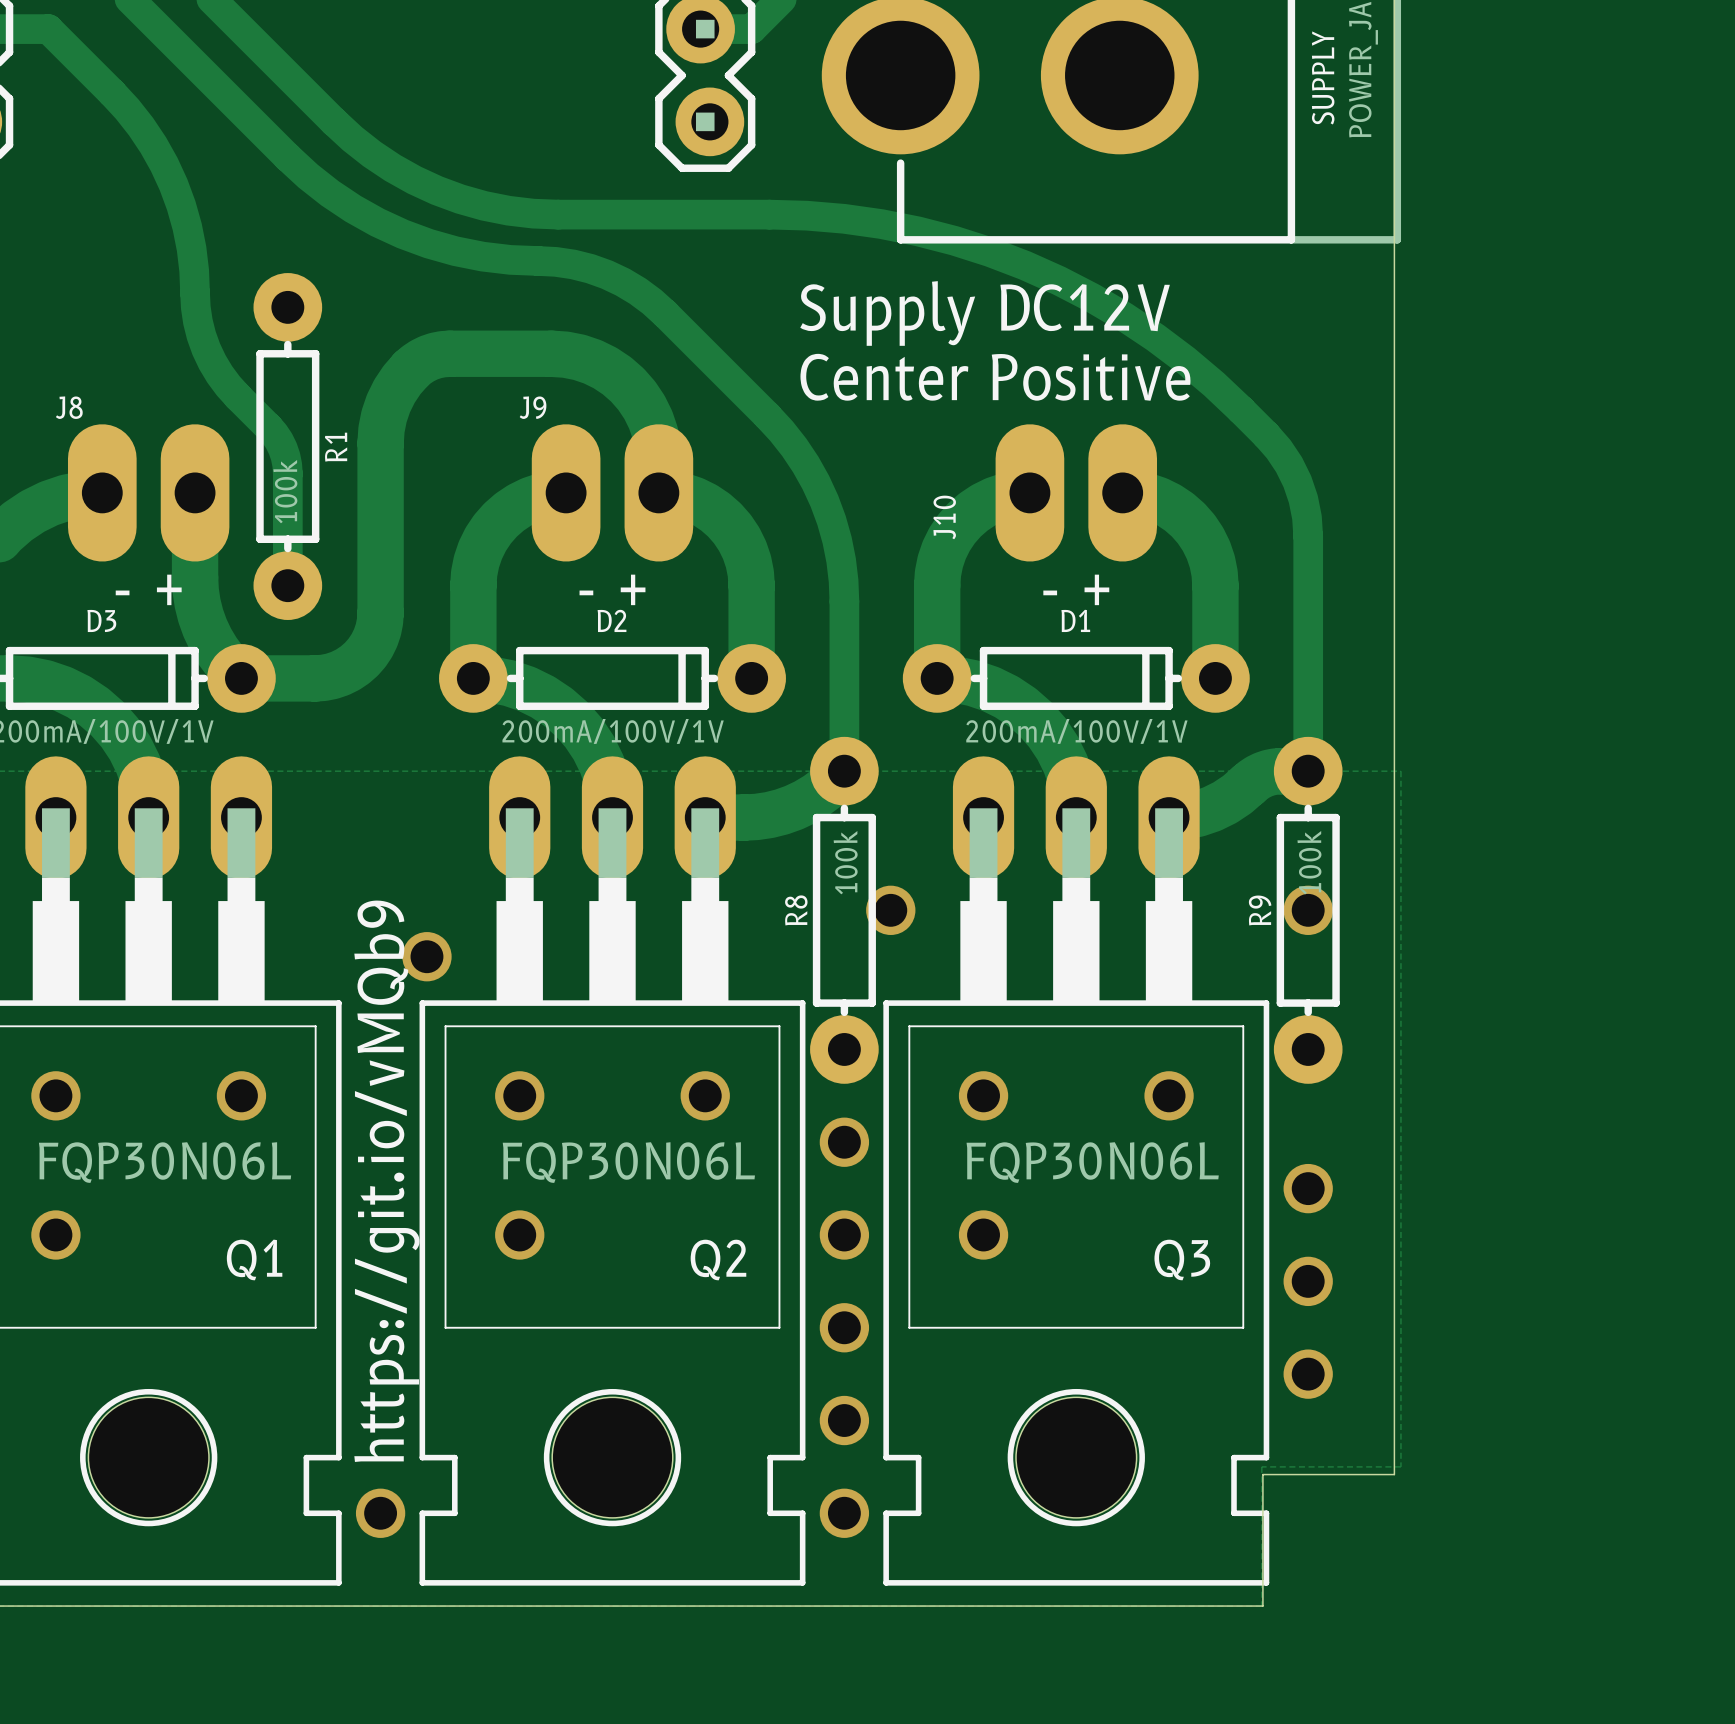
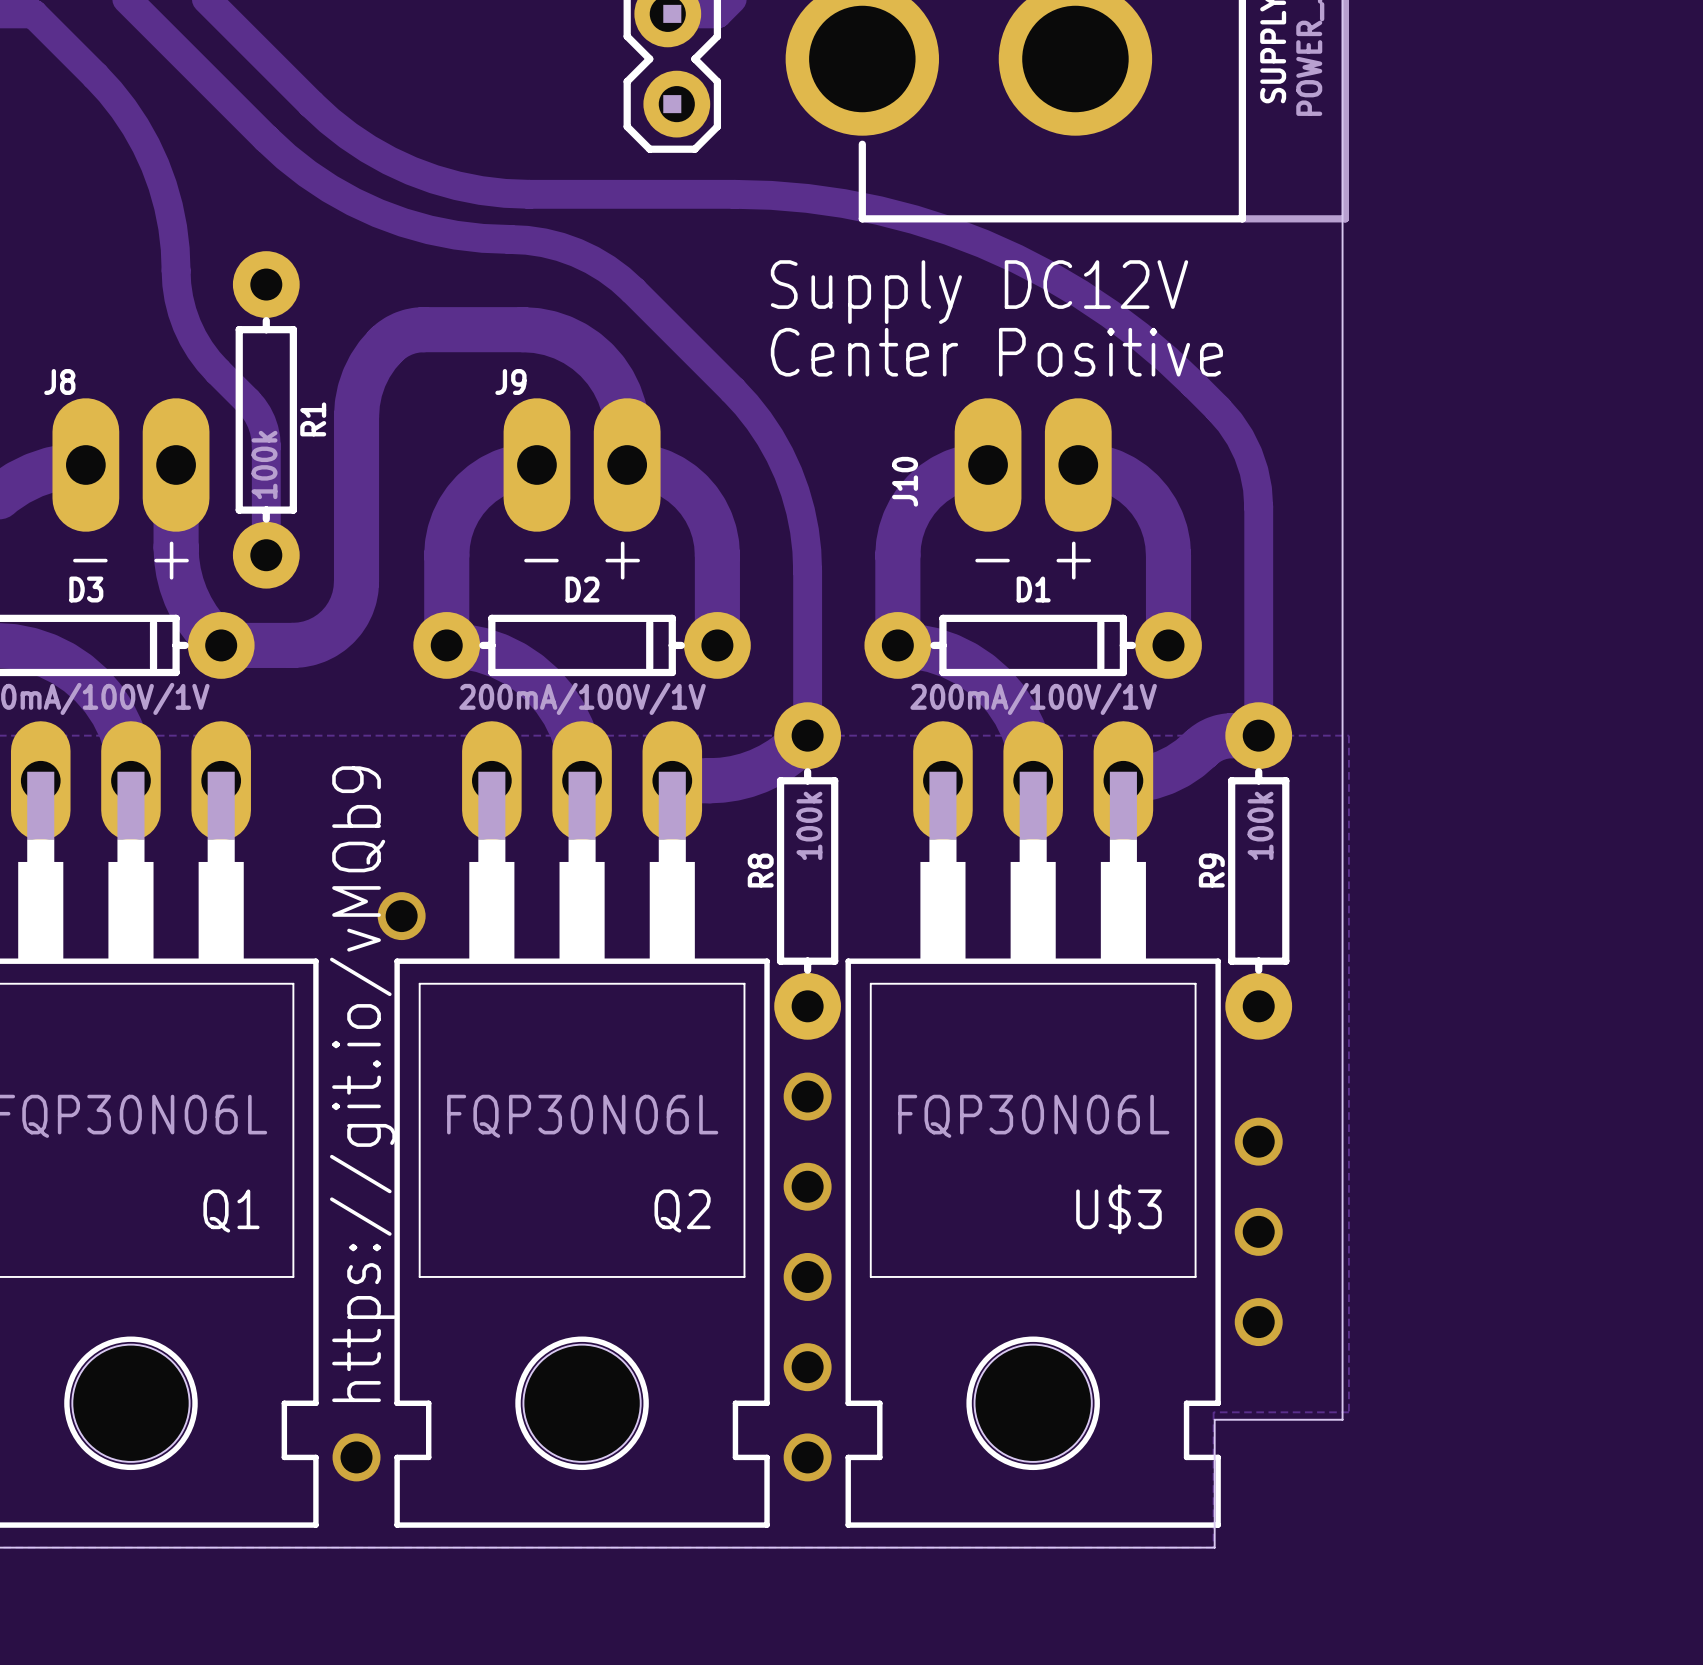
via: (890, 910) -> none
via: (1308, 910) -> none
via: (55, 1095) -> none
via: (241, 1095) -> none
via: (519, 1095) -> none
via: (705, 1095) -> none
via: (983, 1095) -> none
via: (1169, 1095) -> none
via: (55, 1234) -> none
via: (519, 1234) -> none
via: (983, 1234) -> none
Q3 name: Q3 (1182, 1259) -> U$3 (1118, 1209)

